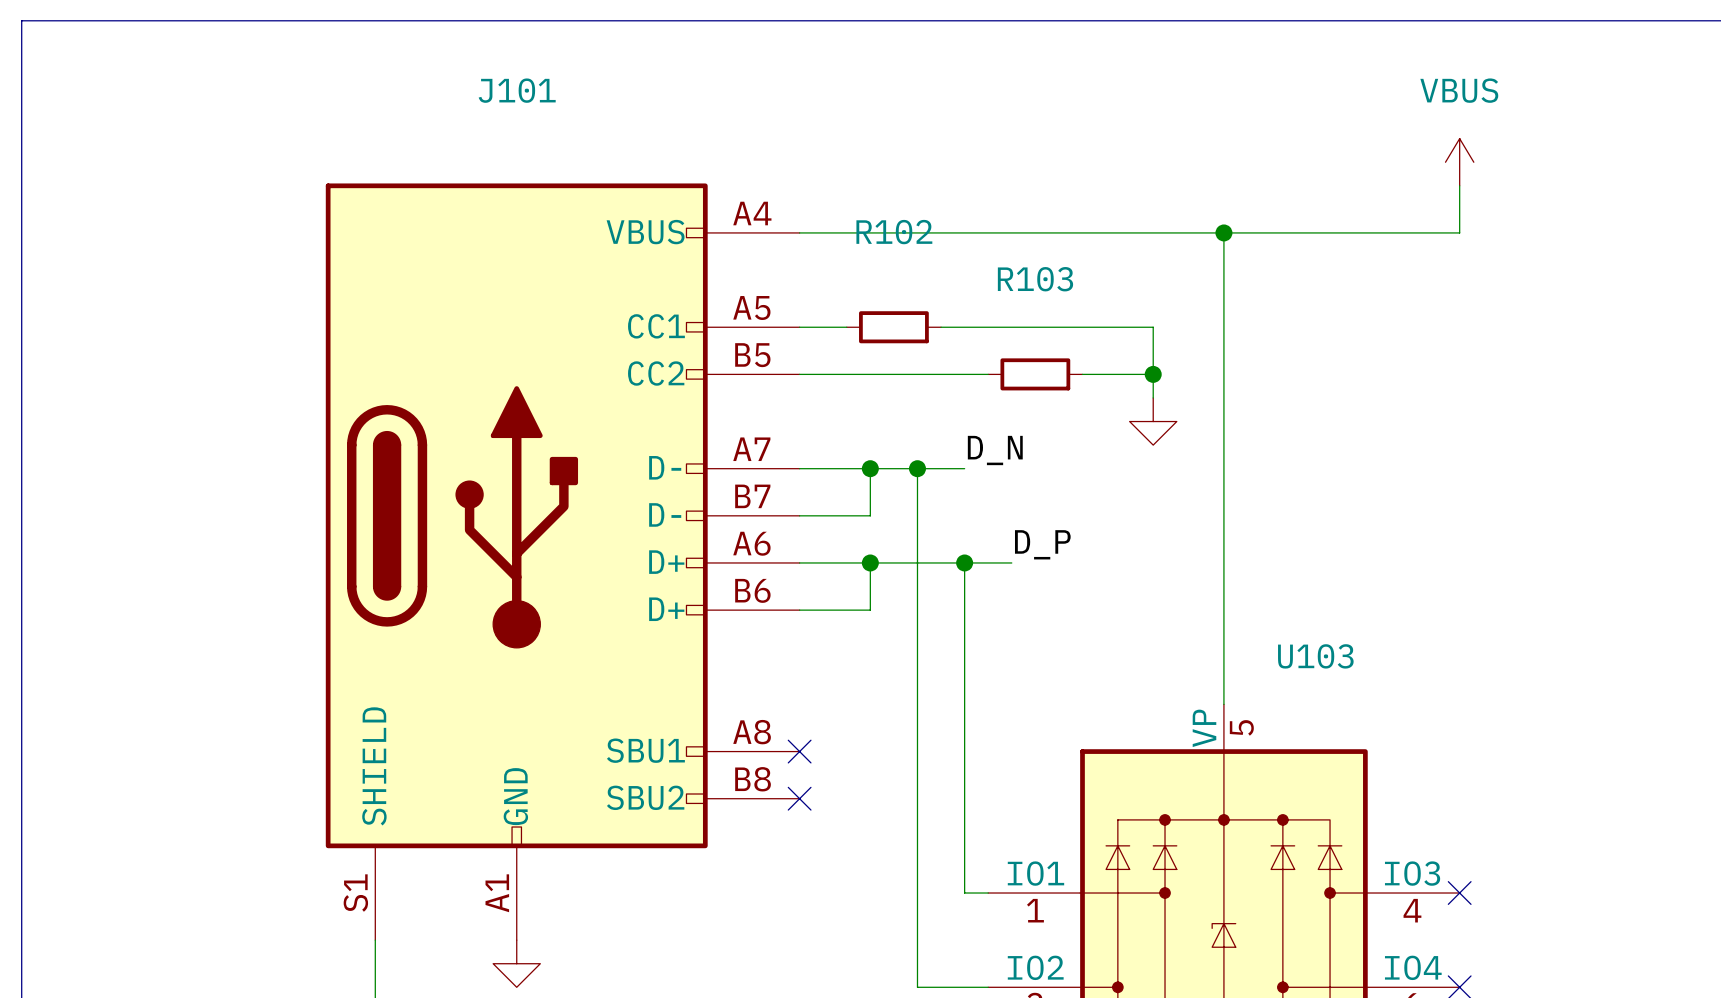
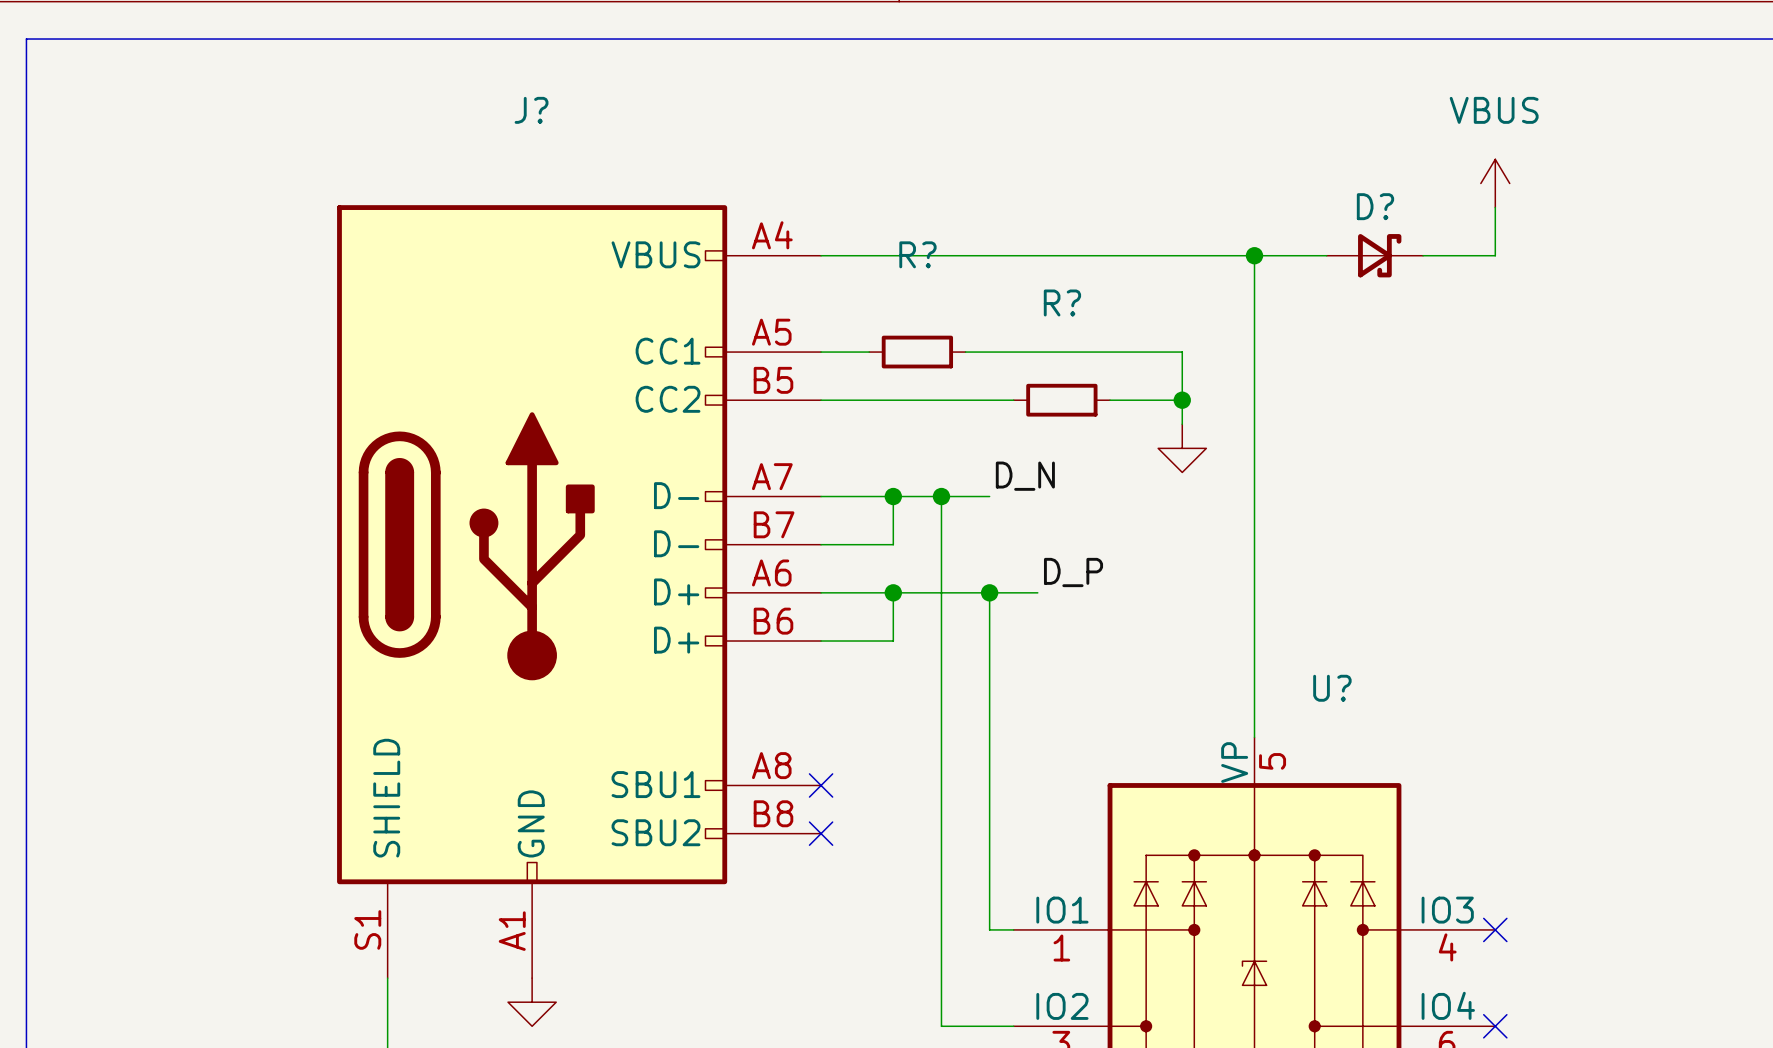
J101 name: J101 (517, 90) -> J? (531, 110)
R102 name: R102 (894, 232) -> R? (917, 254)
D?: none -> (1374, 255)
R103 name: R103 (1035, 279) -> R? (1062, 302)
U103 name: U103 (1315, 656) -> U? (1332, 688)

